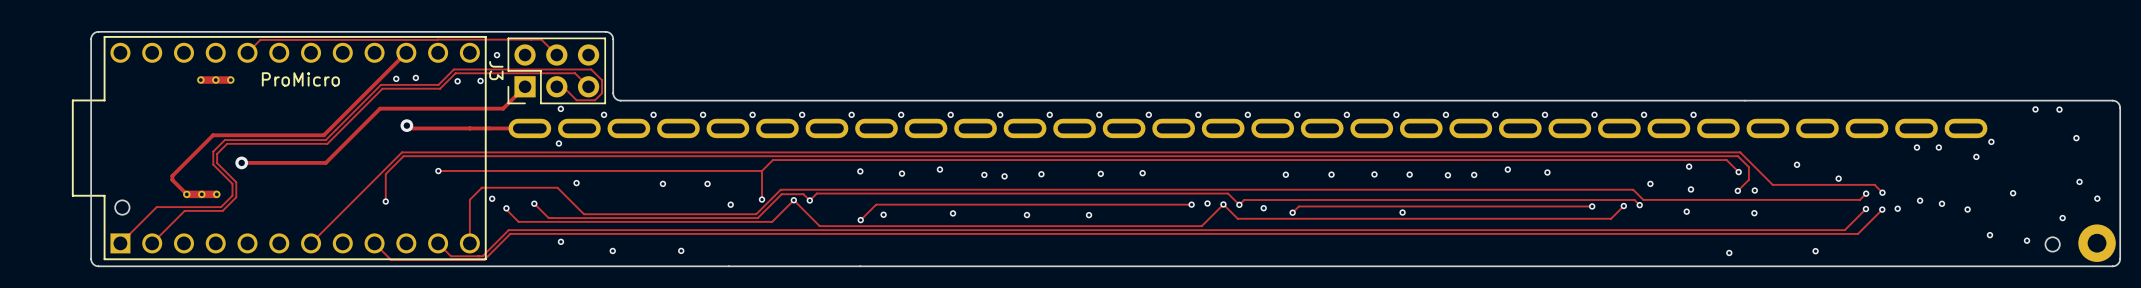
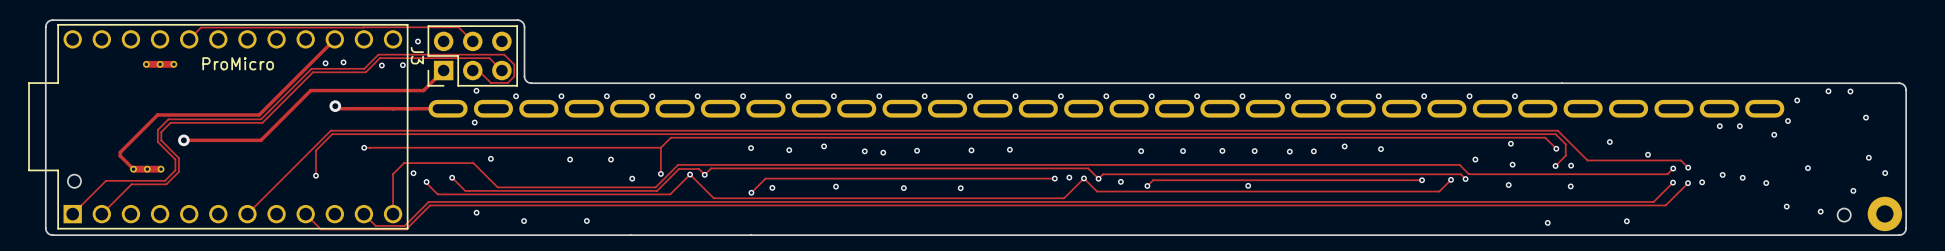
via: none -> (1797, 100)

